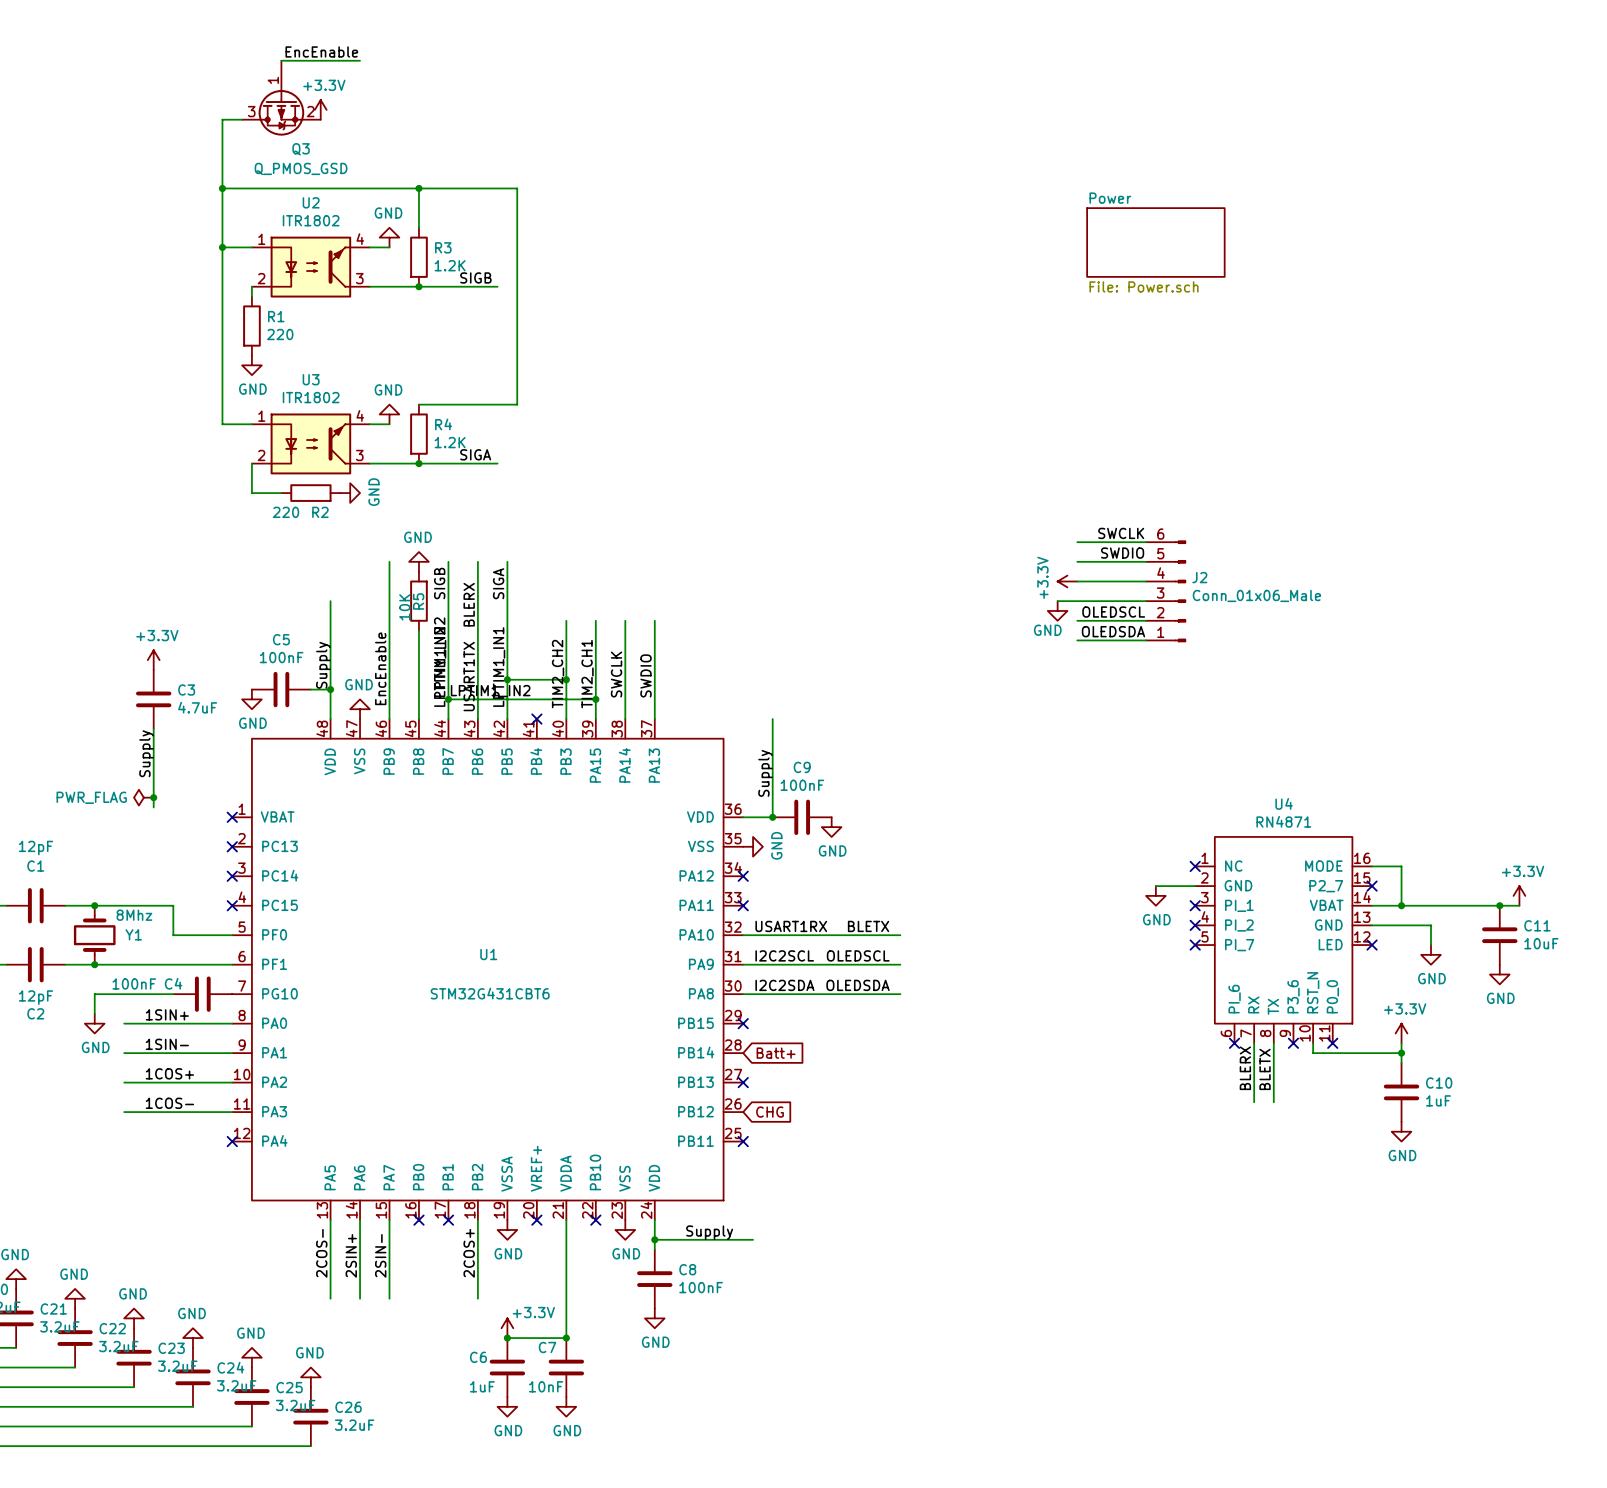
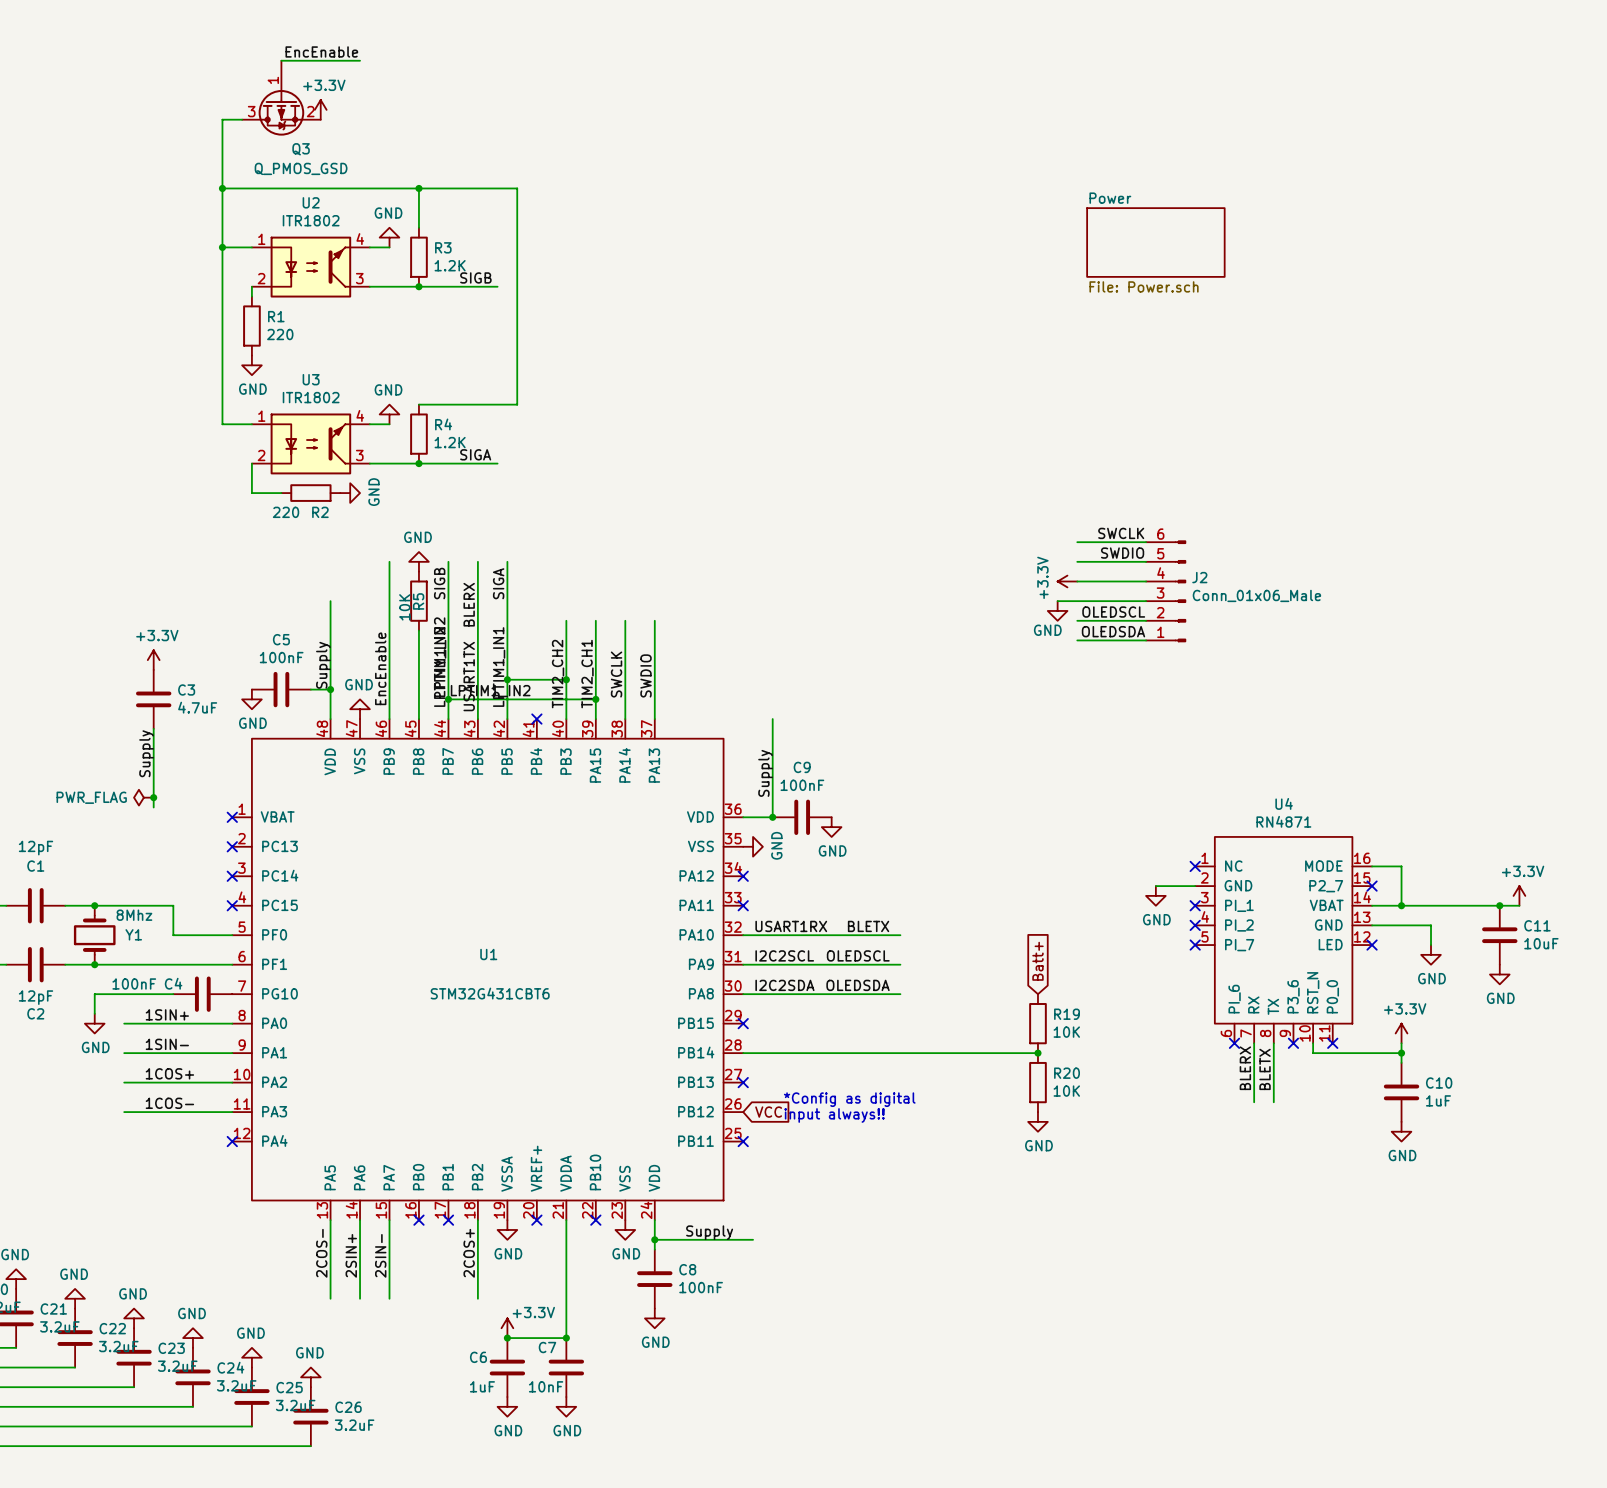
global label: none -> Batt+ (1037, 961)
R19: none -> 10K (1037, 1023)
wire: none -> (743, 1053) (1037, 1053)
global label: Batt+ (776, 1053) -> none
junction: none -> (1037, 1053)
R20: none -> 10K (1037, 1082)
text: none -> *Config as digital (849, 1099)
global label: CHG (770, 1112) -> VCC (768, 1112)
text: none -> input always!! (834, 1115)
power symbol: none -> GND (1037, 1121)

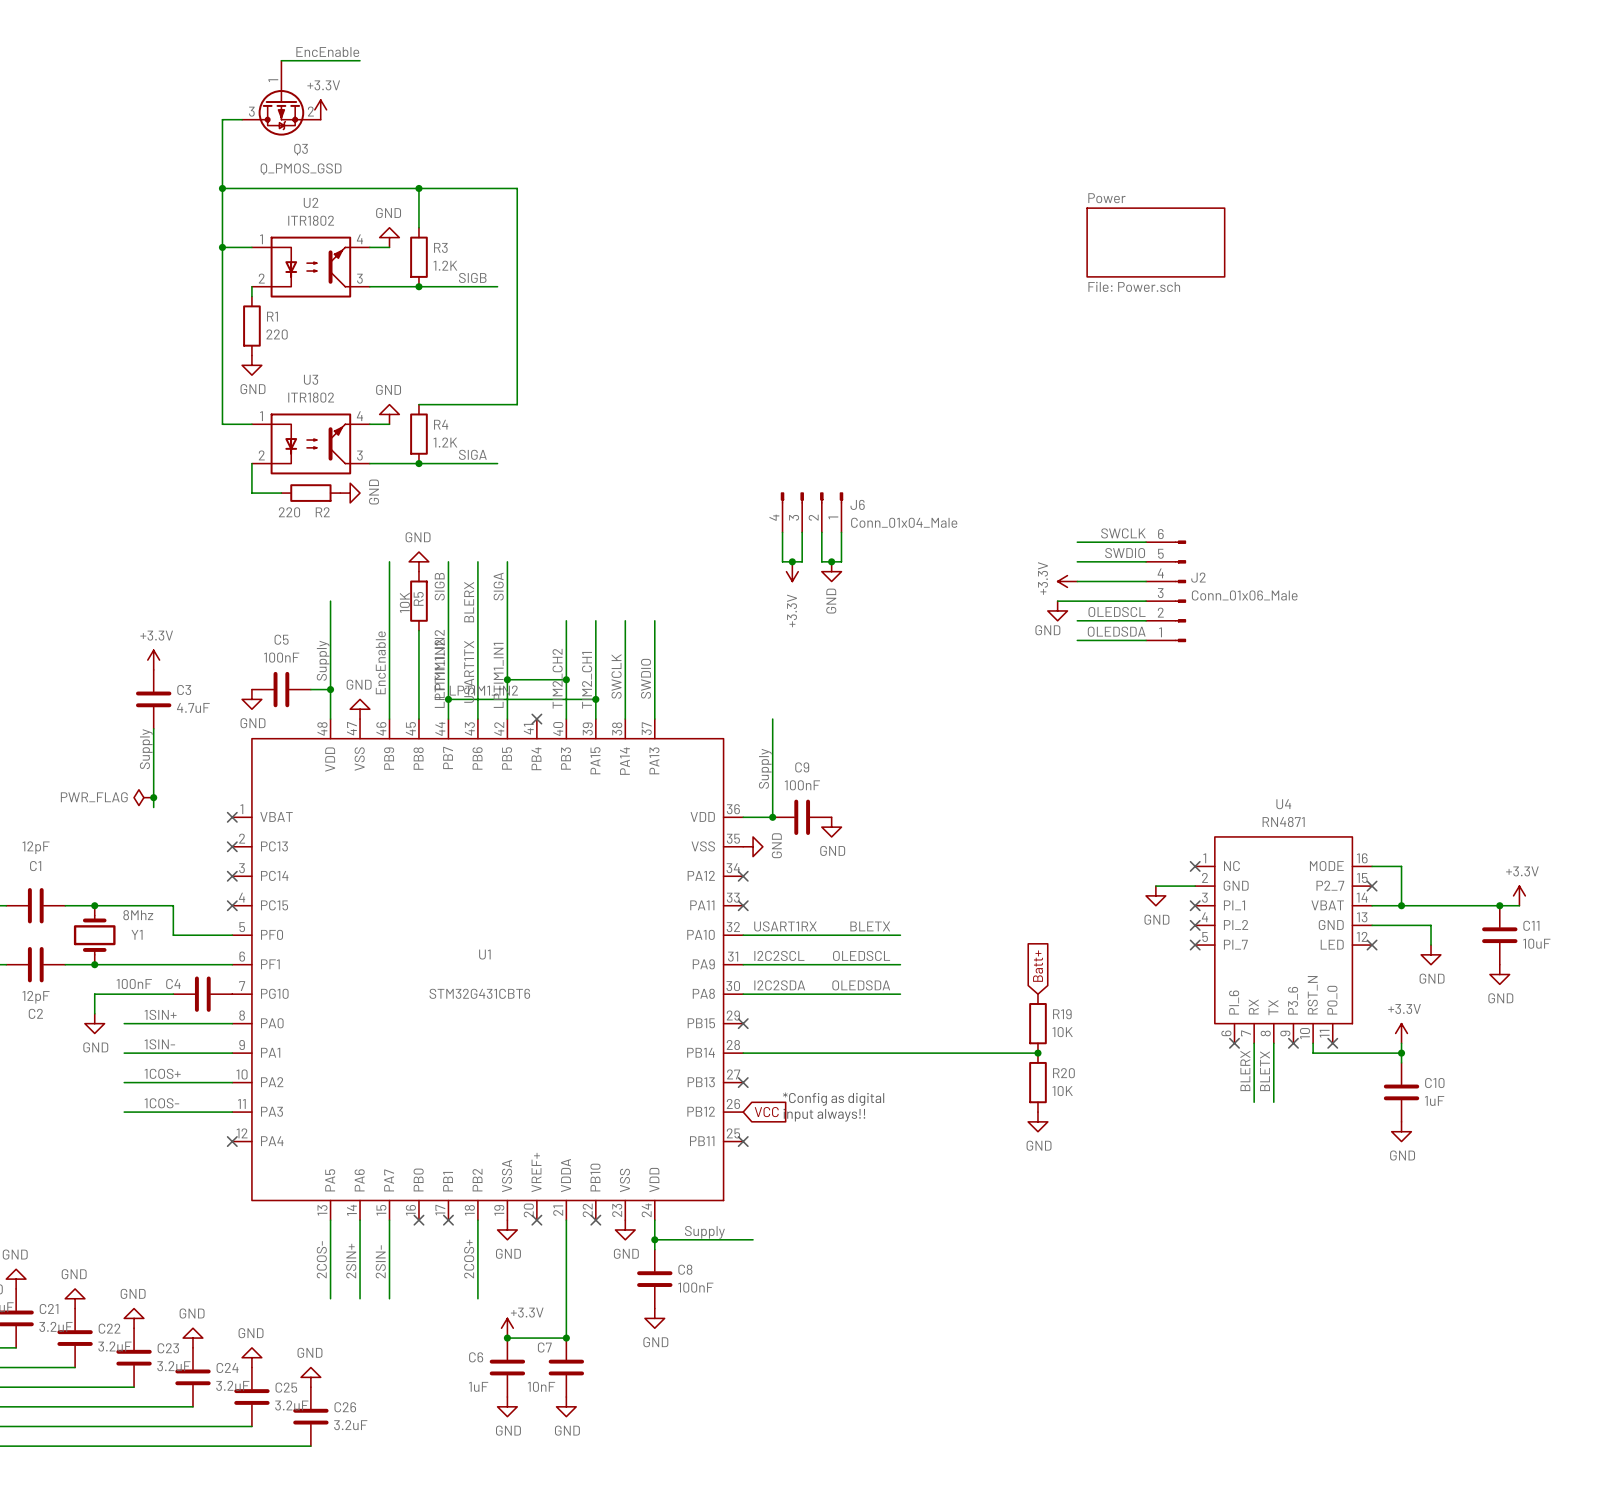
J6: none -> Conn_01x04_Male (812, 512)
wire: none -> (782, 532) (782, 561) (802, 561) (802, 532)
wire: none -> (821, 532) (821, 561) (841, 561) (841, 532)
junction: none -> (792, 561)
junction: none -> (831, 561)
power symbol: none -> +3.3V (792, 571)
power symbol: none -> GND (831, 571)

